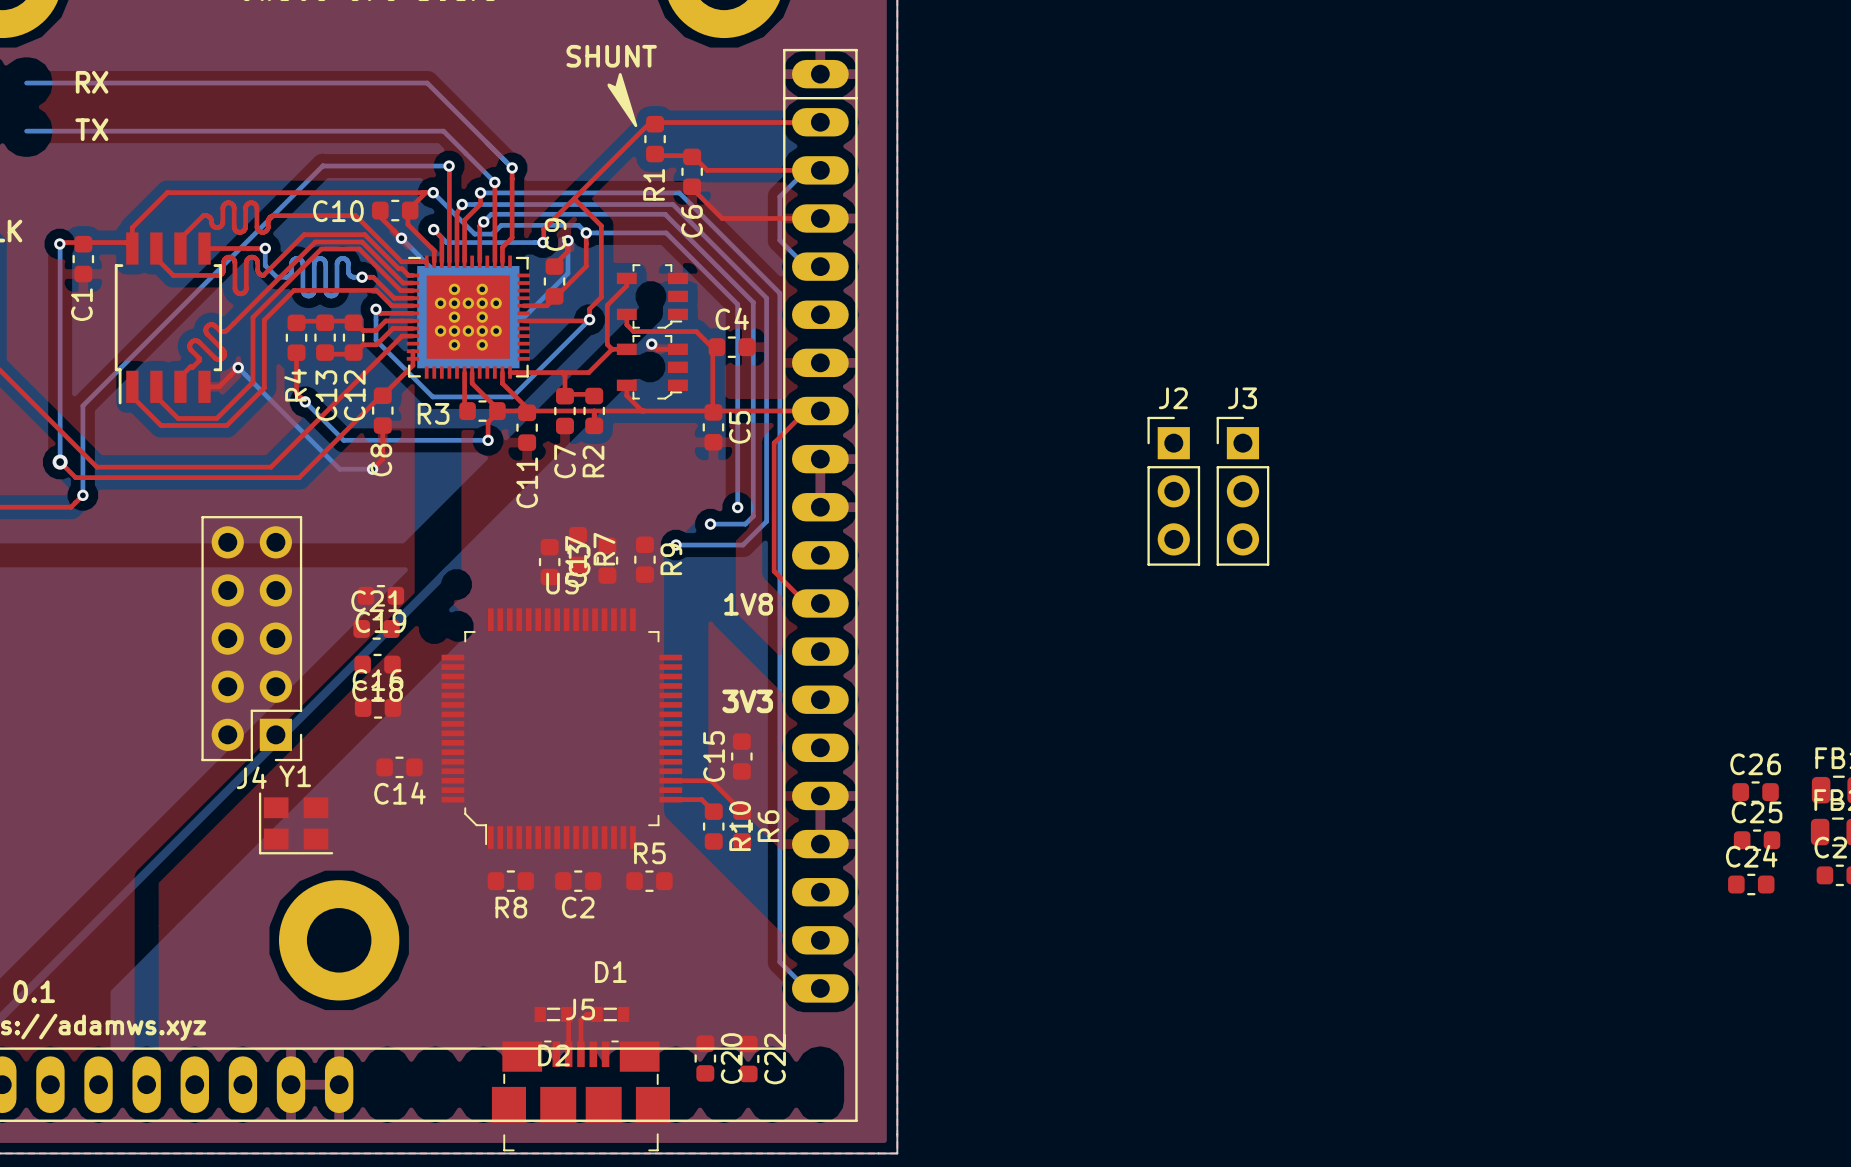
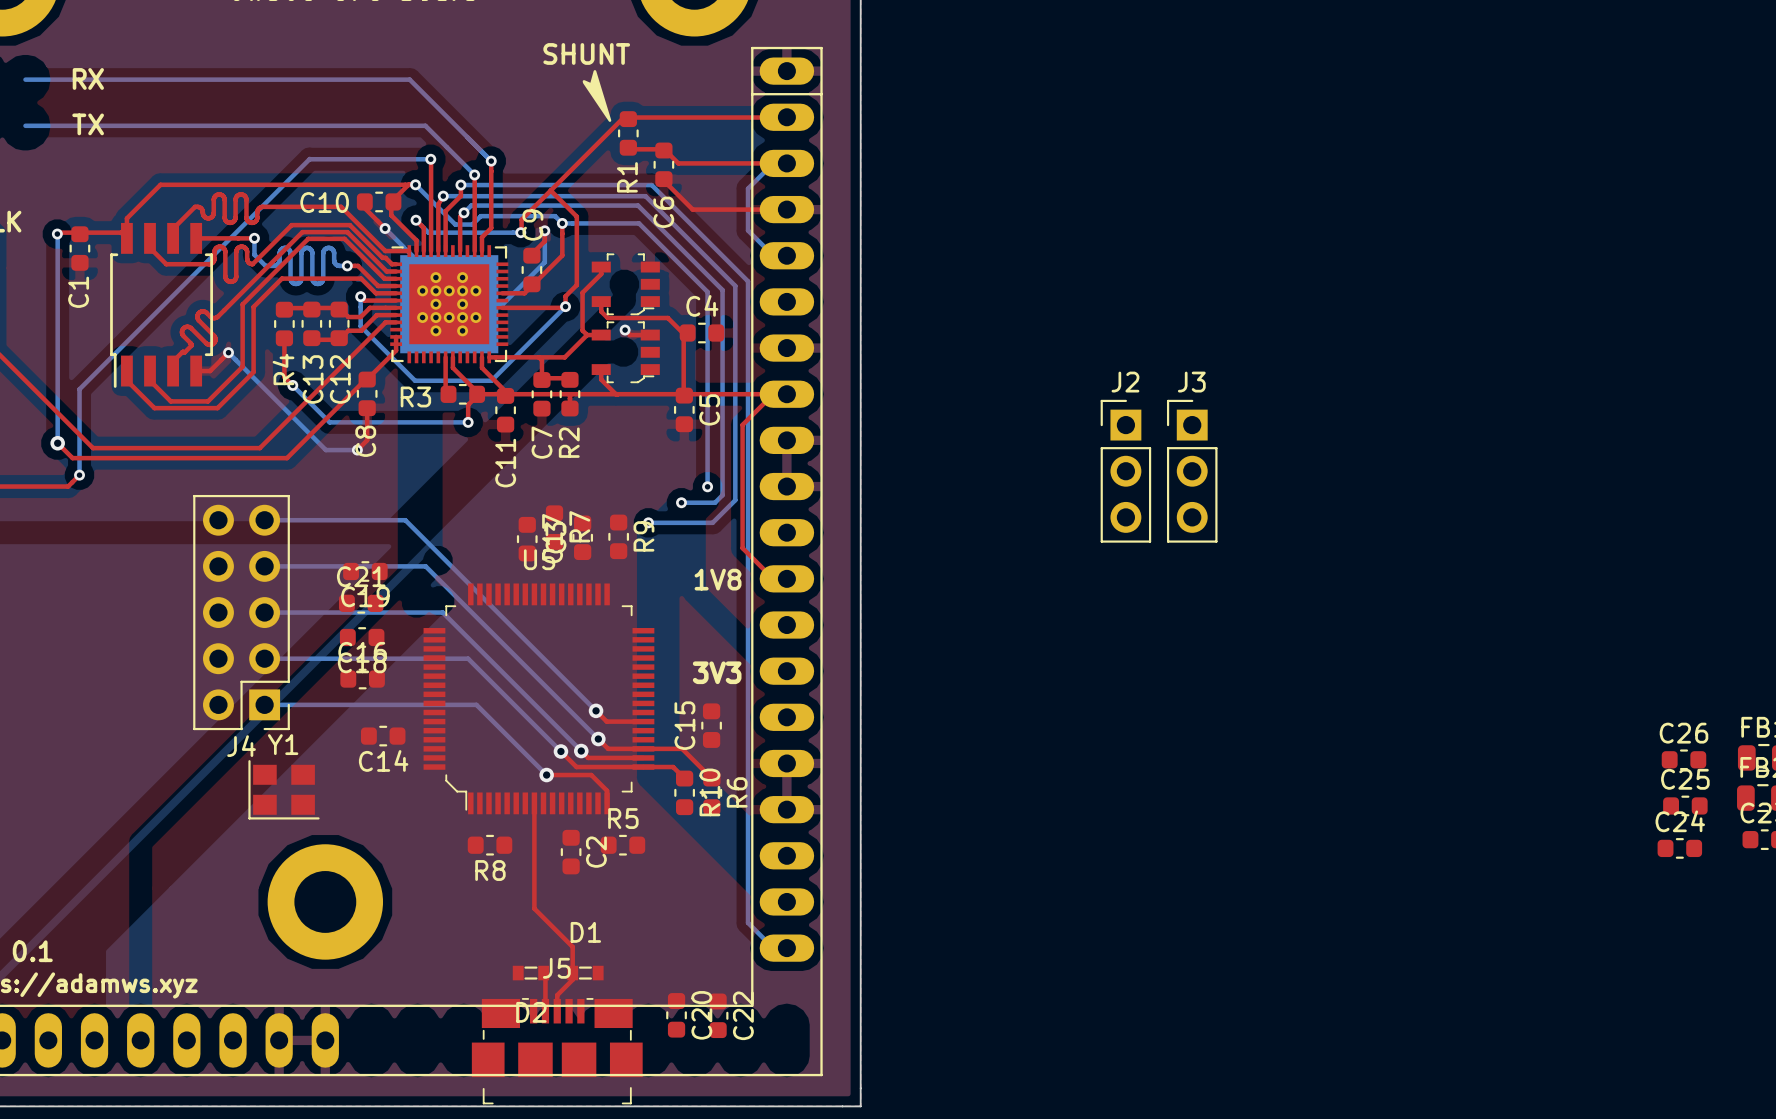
bottom track: none -> (264, 520) (405, 520) (596, 710)
bottom track: none -> (264, 566) (425, 566) (598, 739)
bottom track: none -> (264, 612) (442, 612) (581, 751)
bottom track: none -> (264, 658) (468, 658) (560, 751)
bottom track: none -> (264, 704) (476, 704) (546, 775)
top track: none -> (596, 710) (606, 721) (643, 721)
via: none -> (596, 710)
top track: none -> (598, 739) (608, 748) (643, 748)
via: none -> (598, 739)
top track: none -> (581, 751) (588, 757) (643, 757)
via: none -> (581, 751)
top track: none -> (560, 751) (576, 767) (643, 767)
via: none -> (560, 751)
top track: none -> (546, 775) (591, 775) (607, 790) (607, 803)
via: none -> (546, 775)
C2 rotation: 0° (578, 881) -> 90° clockwise (571, 852)
C2 name position: C2 (578, 907) -> C2 (596, 852)
top track: (597, 1014) (586, 1014) (580, 1020) (580, 1037) -> (534, 803) (534, 908) (572, 946) (572, 979) (557, 995)

